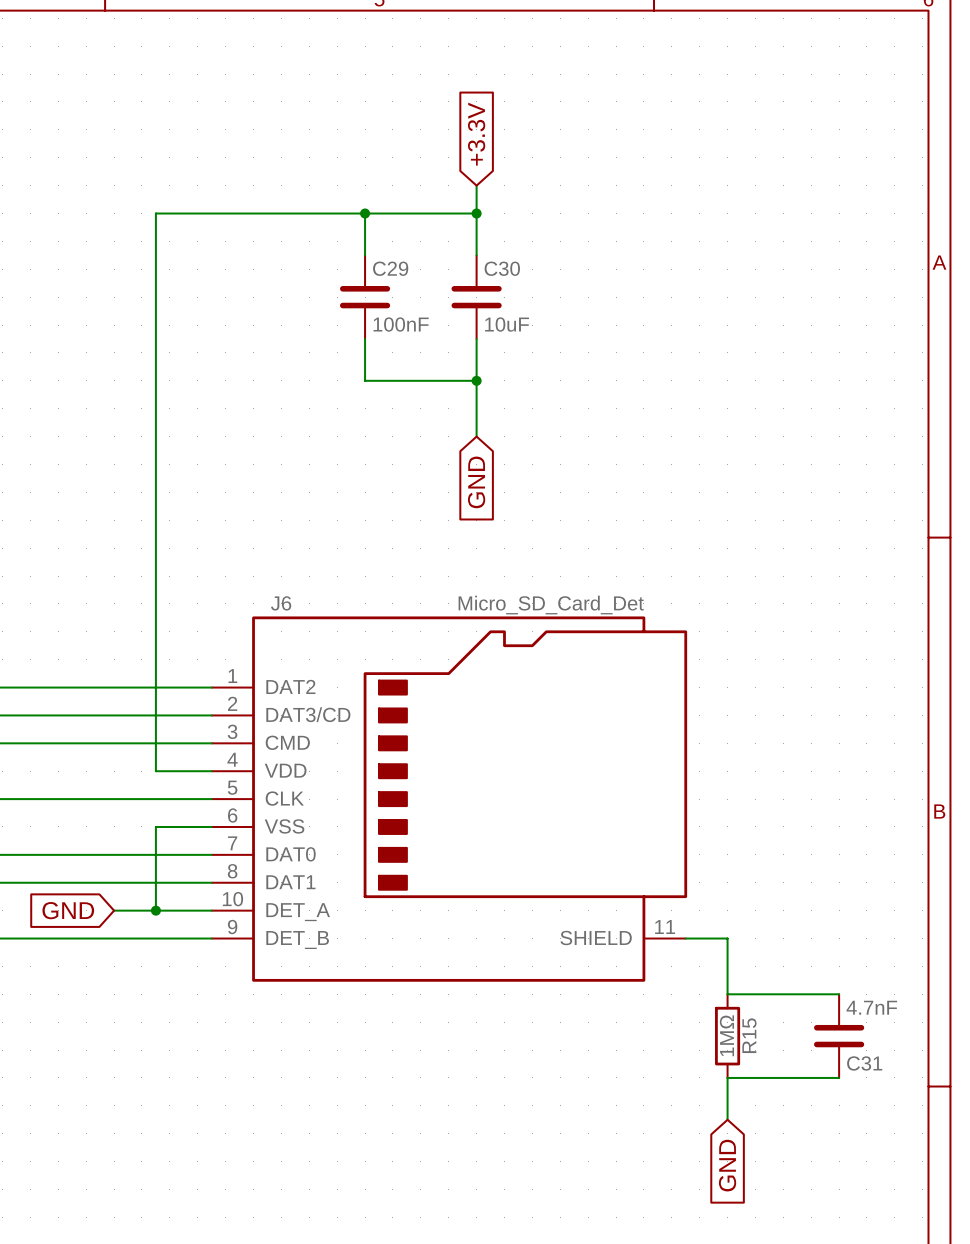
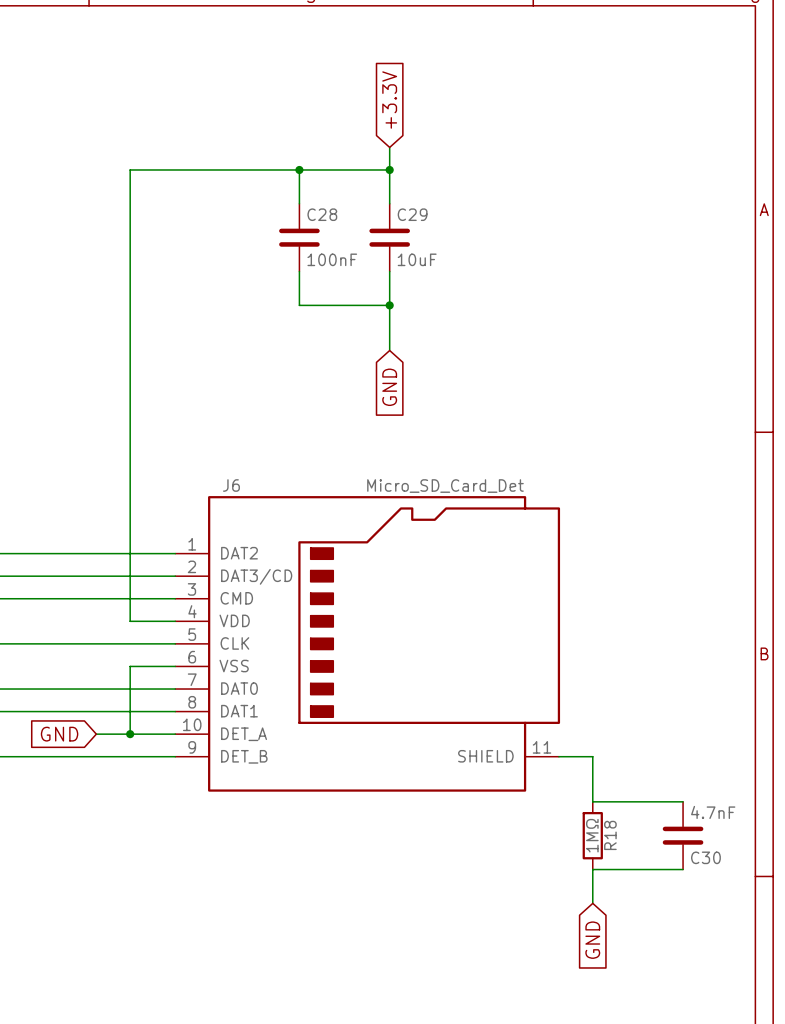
C29 name: C29 (390, 268) -> C28 (322, 214)
C30 name: C30 (502, 268) -> C29 (412, 214)
R15 name: R15 (749, 1035) -> R18 (610, 835)
C31 name: C31 (864, 1063) -> C30 (705, 857)

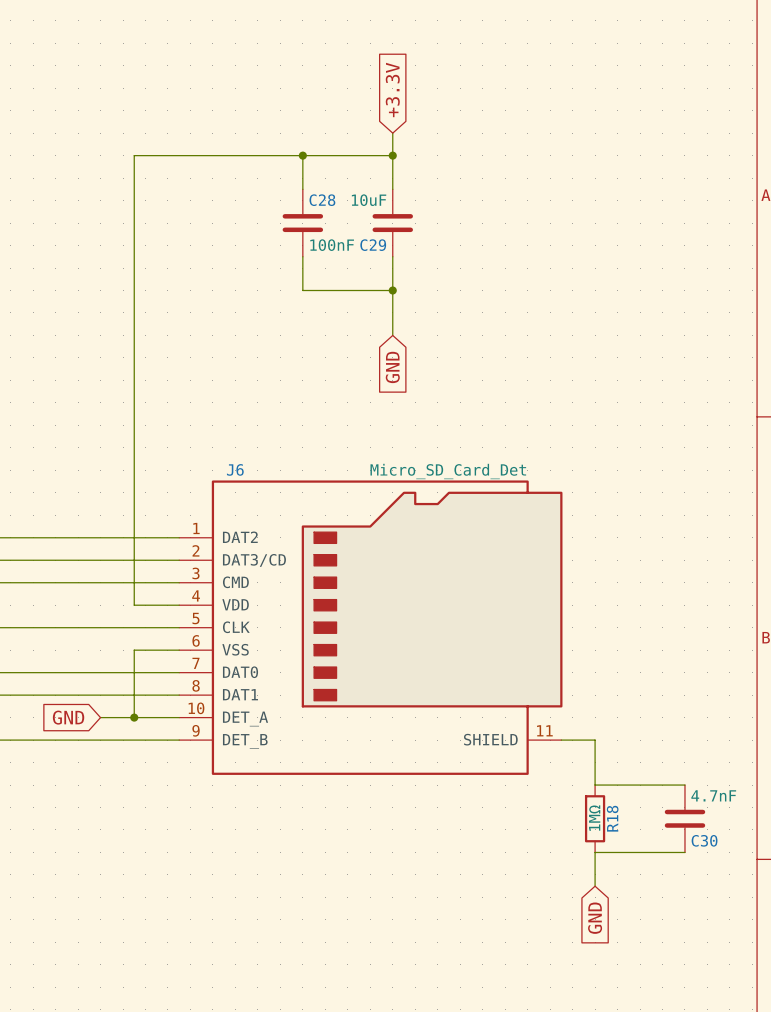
C29 name position: C29 (412, 214) -> C29 (373, 245)
C29 value position: 10uF (417, 259) -> 10uF (369, 200)

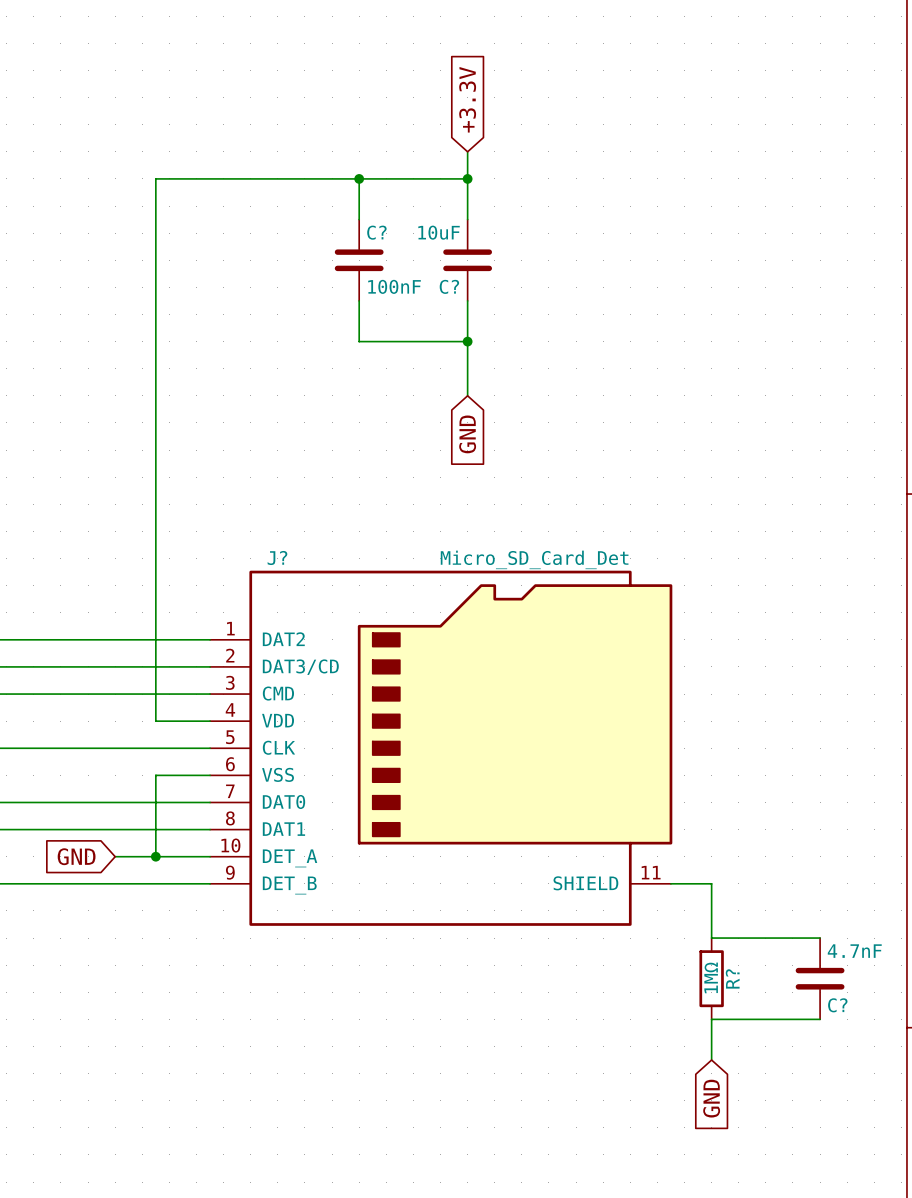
C28 name: C28 (322, 200) -> C? (376, 232)
C29 name: C29 (373, 245) -> C? (449, 286)
J6 name: J6 (235, 469) -> J? (277, 557)
R18 name: R18 (612, 818) -> R? (732, 978)
C30 name: C30 (704, 840) -> C? (837, 1005)

